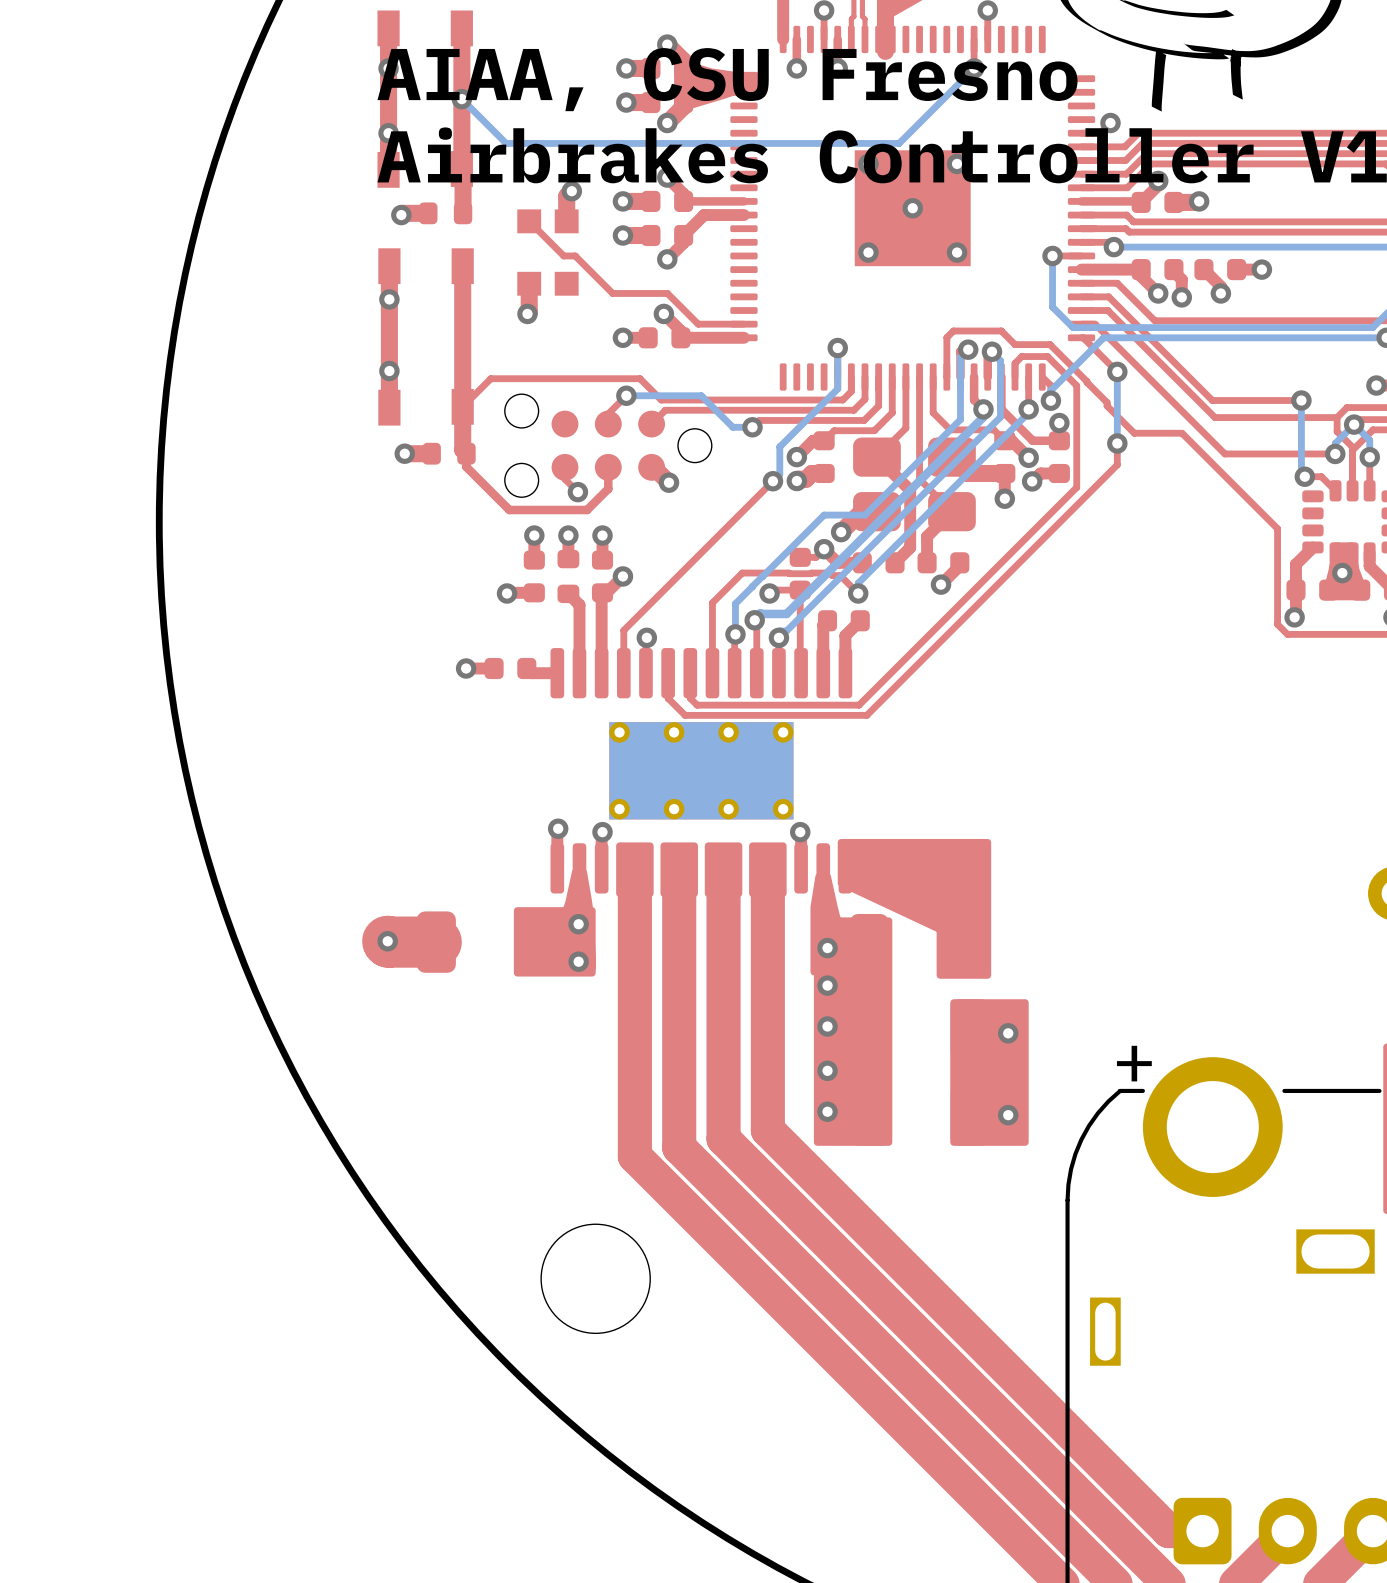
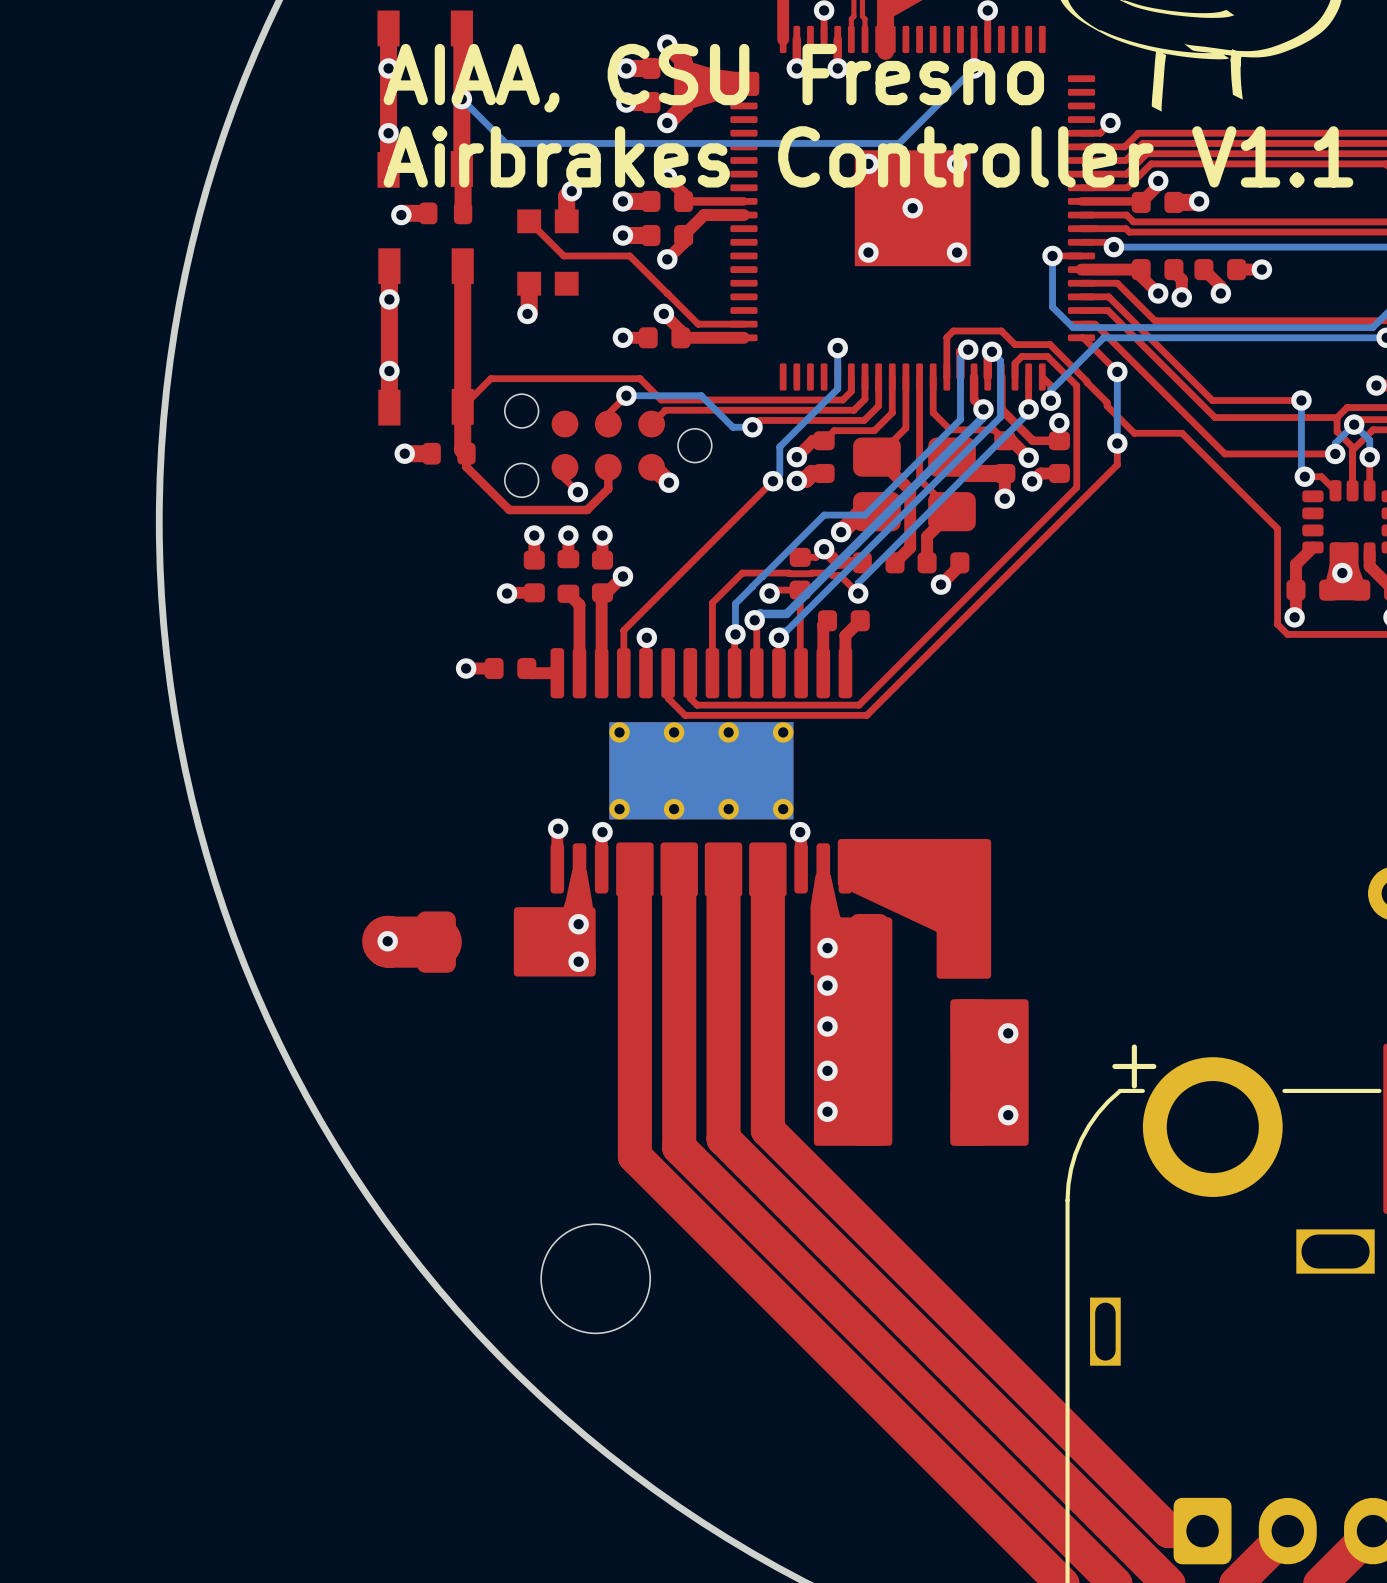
top track: (575, 255) (612, 293) (667, 293) -> (575, 255) (629, 255) (667, 293)

